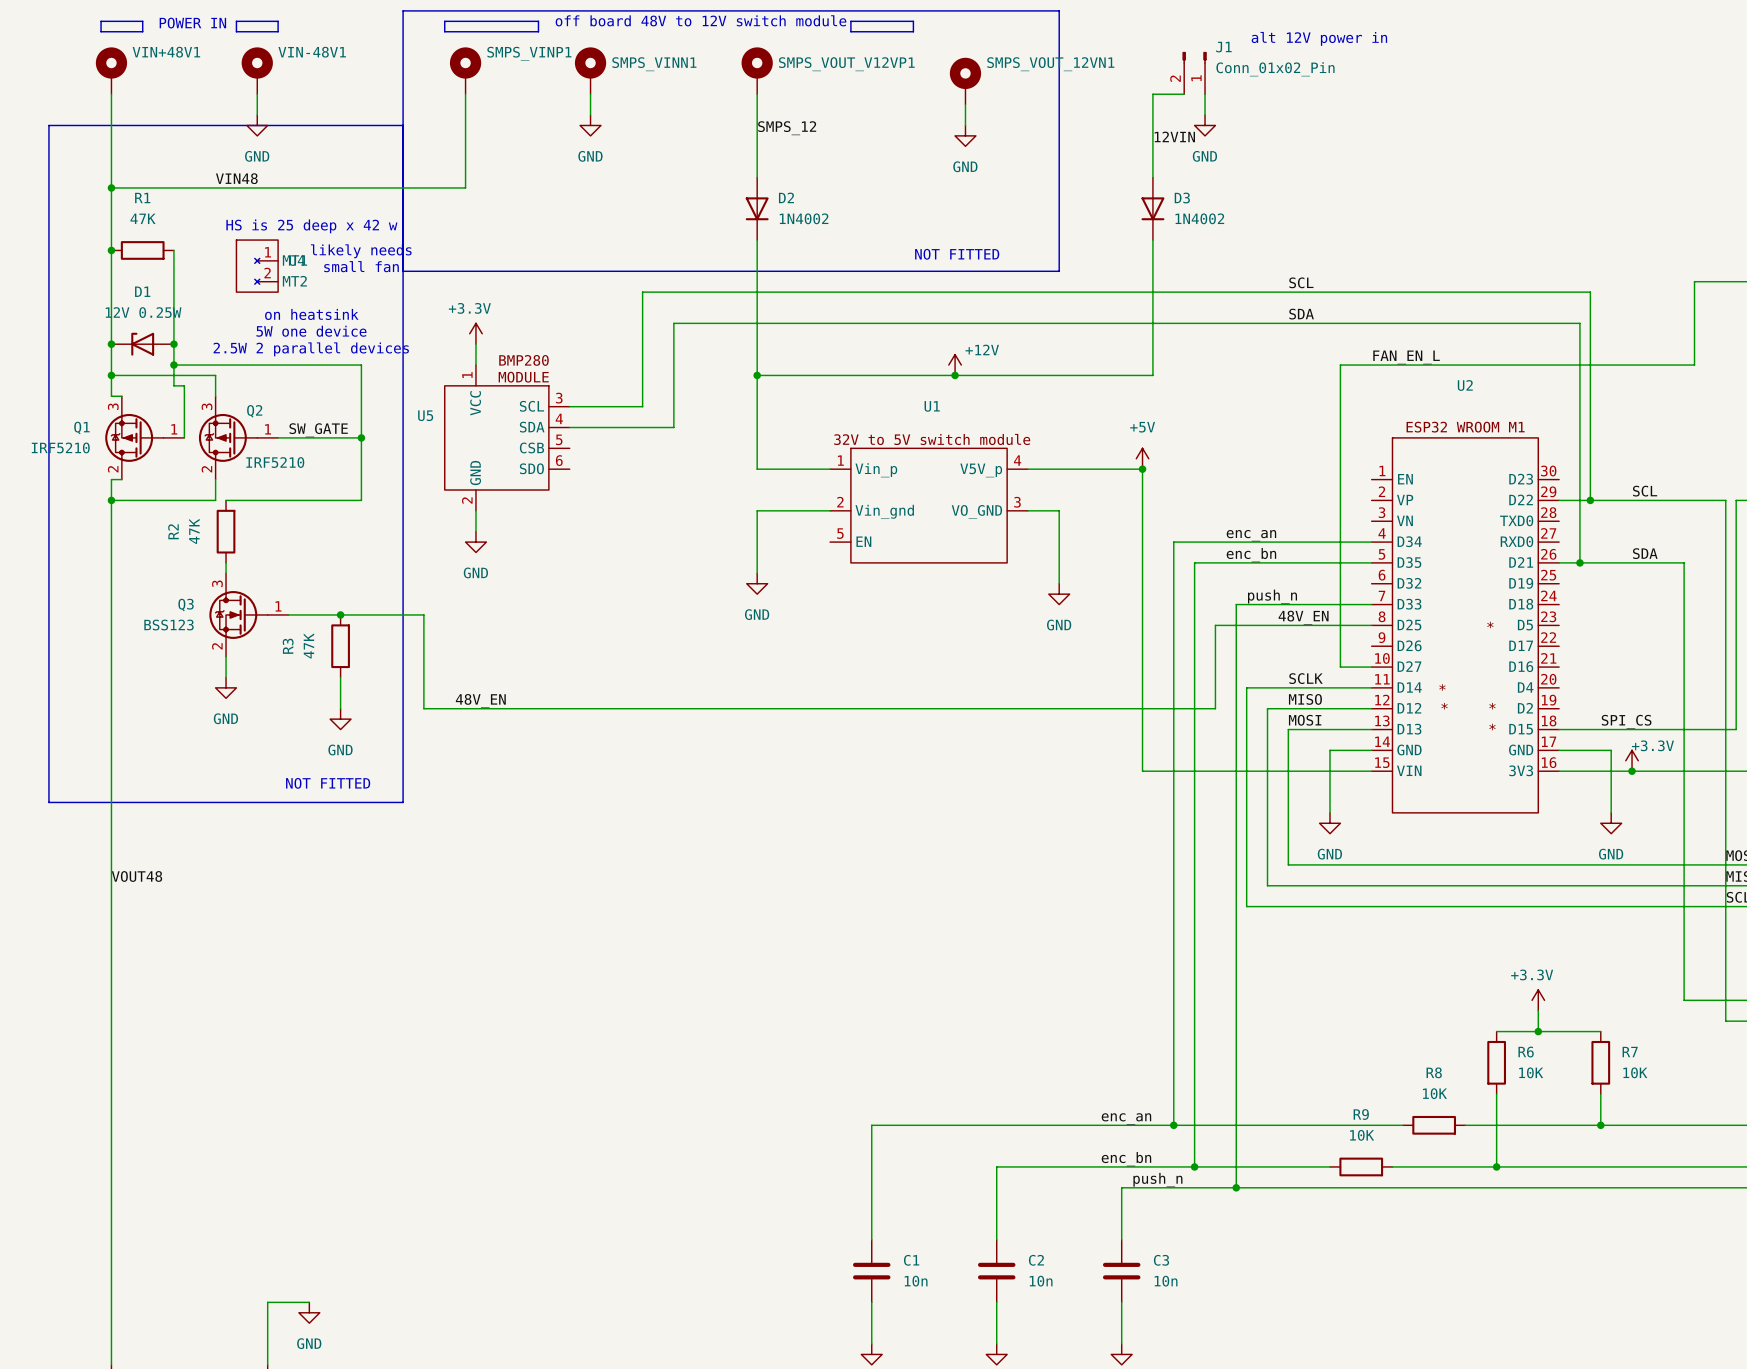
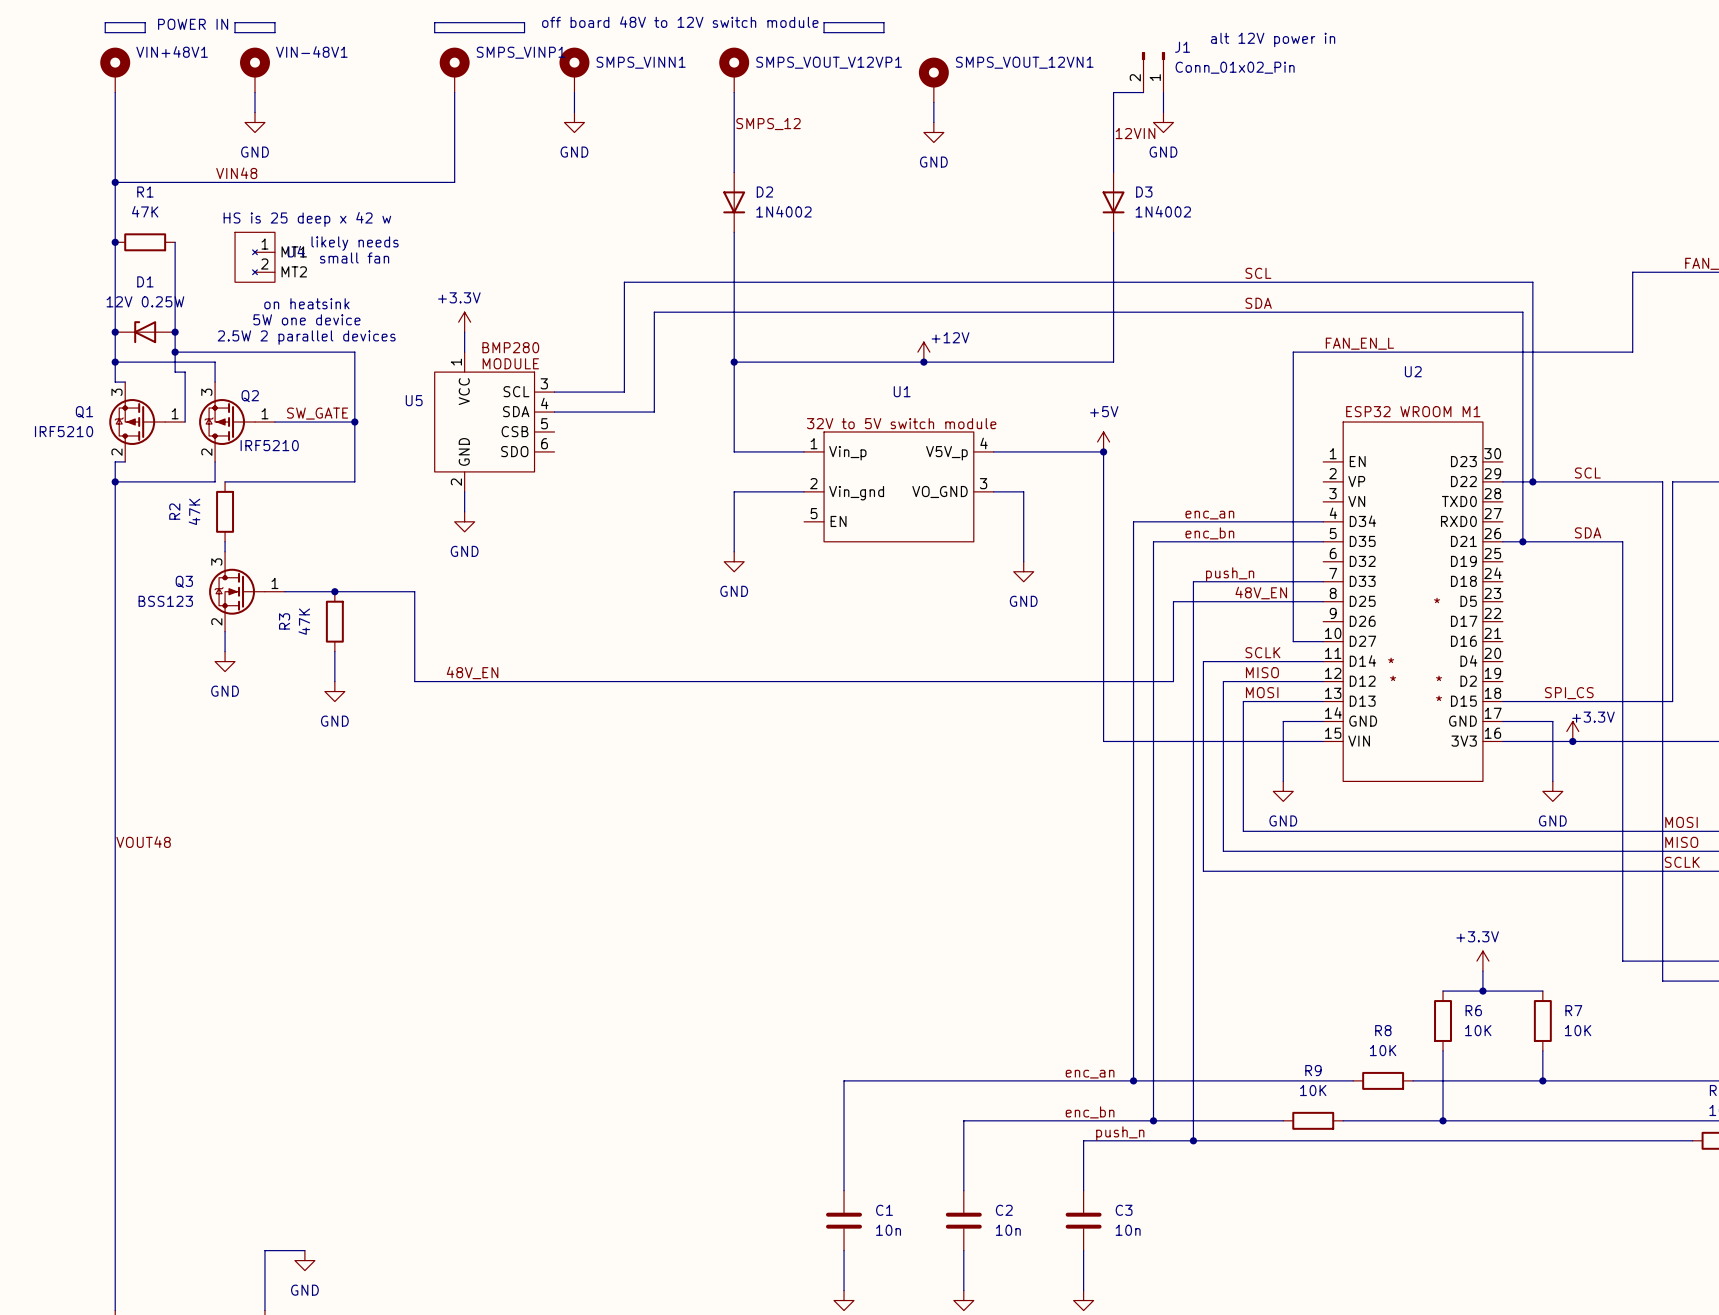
line: (403, 125) (48, 125) (48, 802) (403, 802) (403, 10) (1059, 10) (1059, 271) (403, 271) -> none
text: NOT FITTED (957, 254) -> none
text: NOT FITTED (328, 783) -> none

